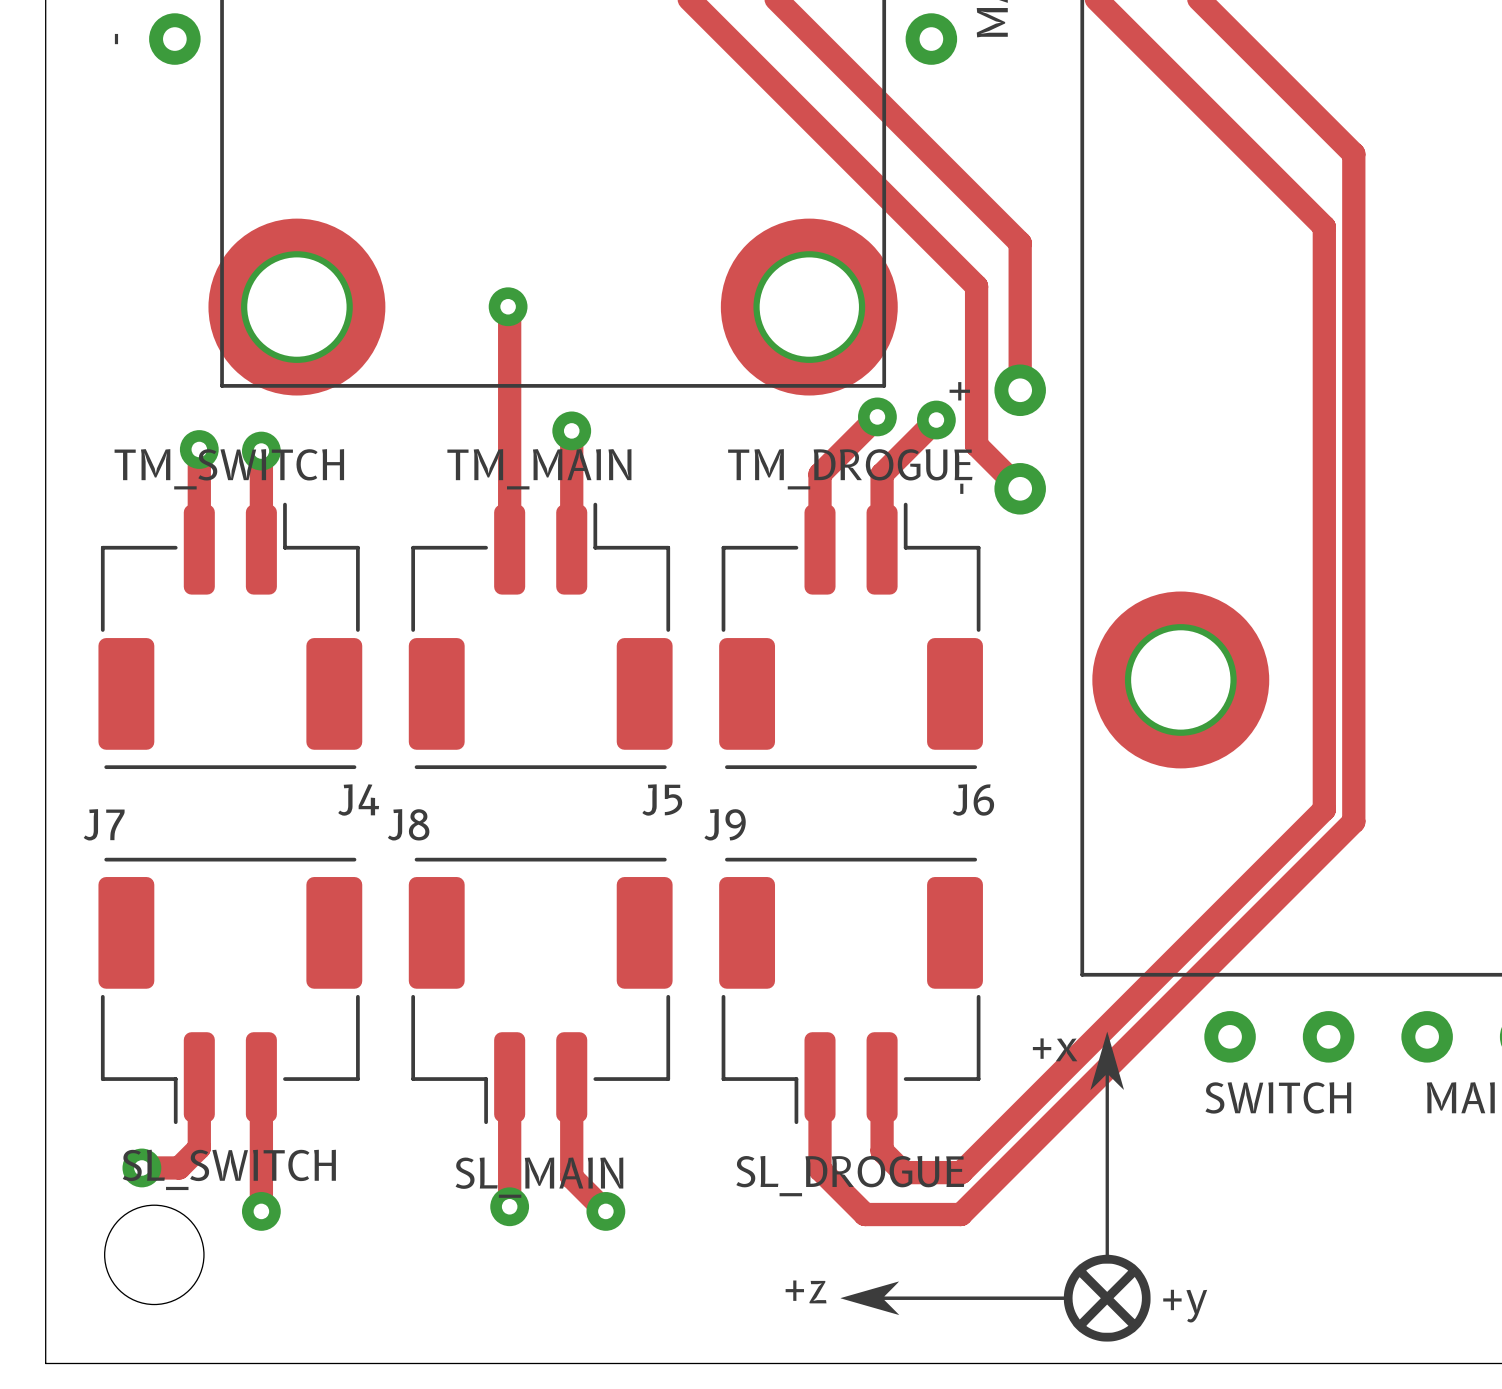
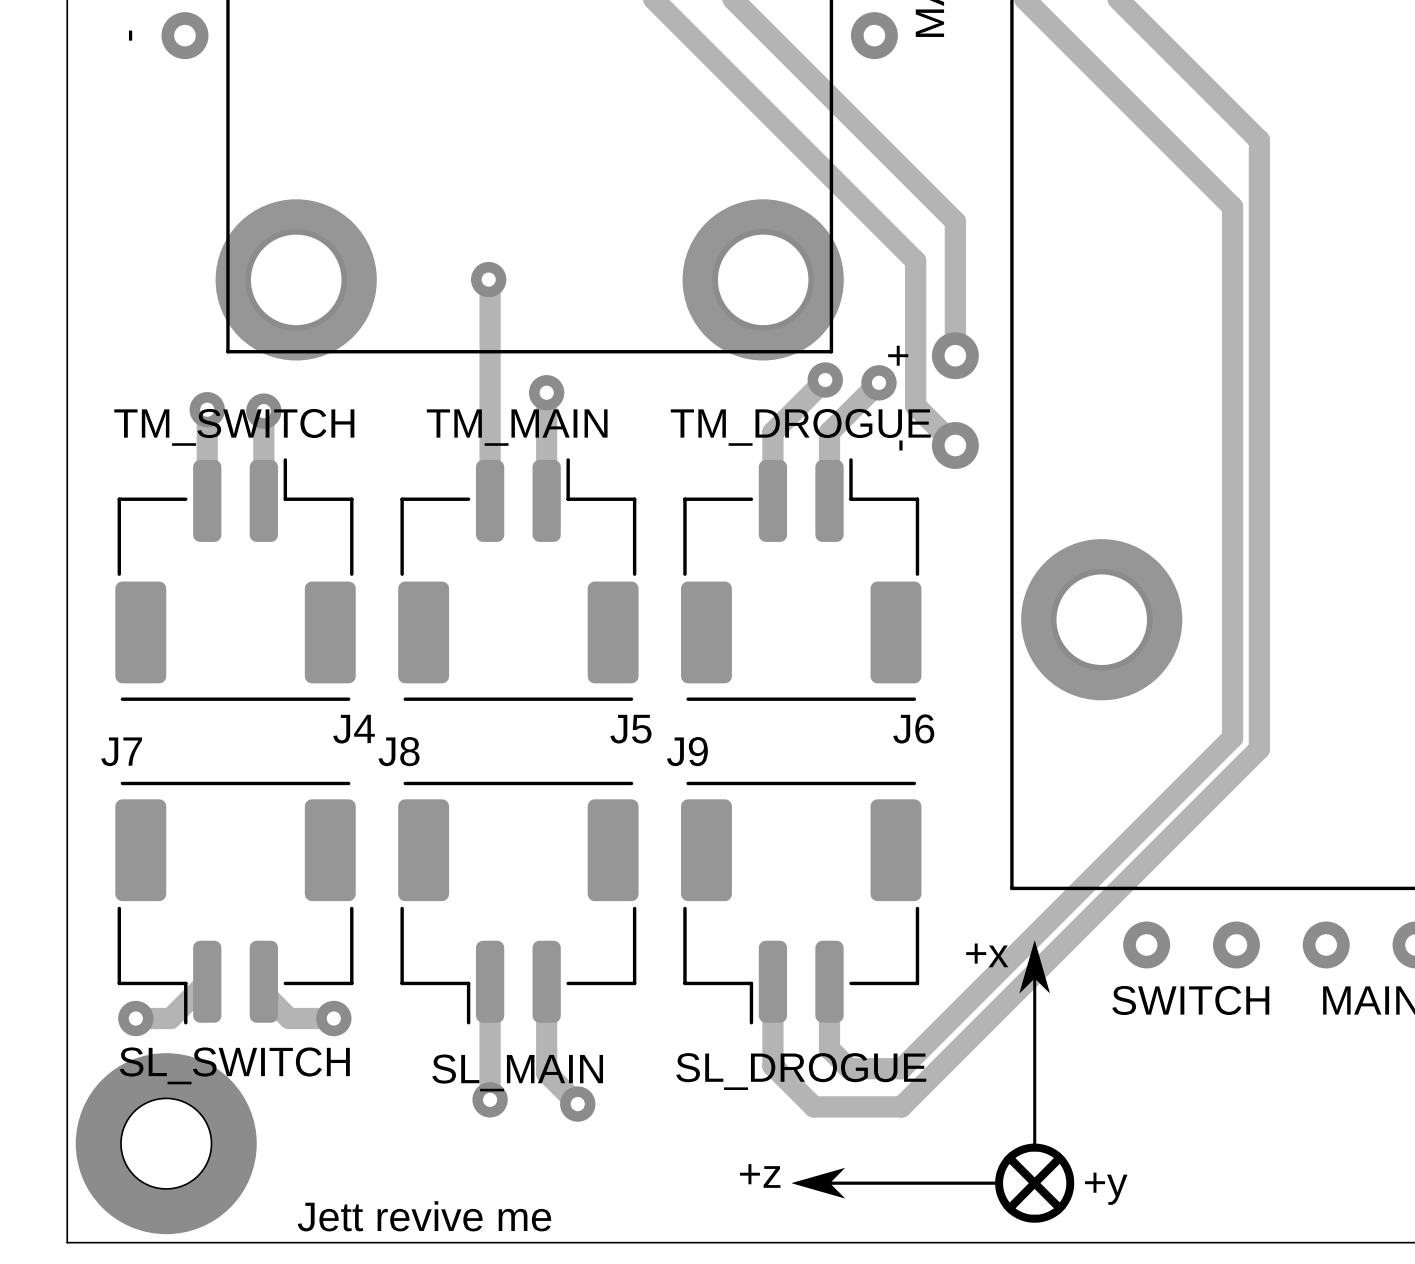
track: (199, 1077) (199, 1147) (179, 1167) (141, 1167) -> (207, 981) (170, 1018) (135, 1018)
track: (261, 1089) (261, 1211) -> (263, 993) (289, 1018) (333, 1018)
via: none -> (333, 1018)
via position: (141, 1167) -> (135, 1018)
via: (261, 1211) -> none
part: none -> (166, 1143)
text: none -> Jett revive me (424, 1216)

